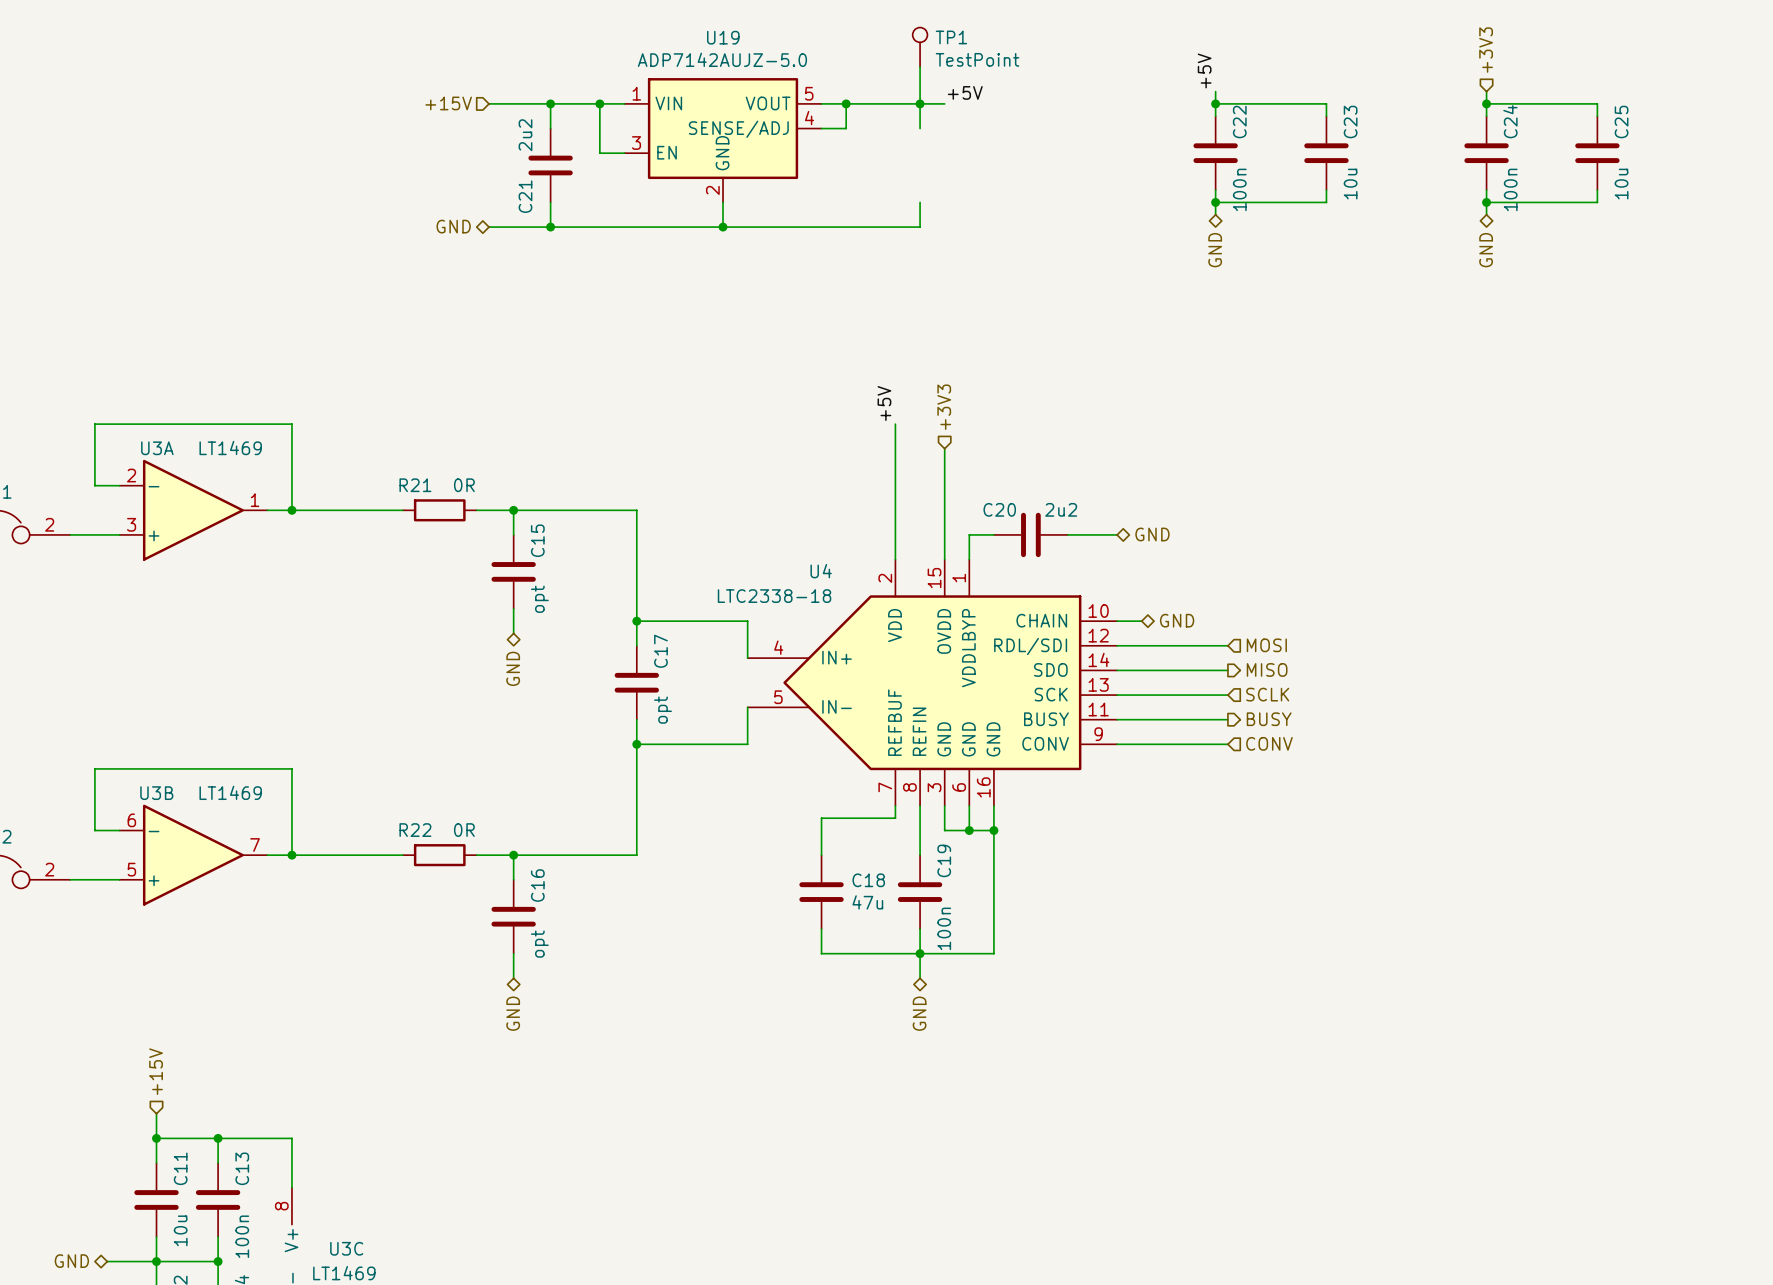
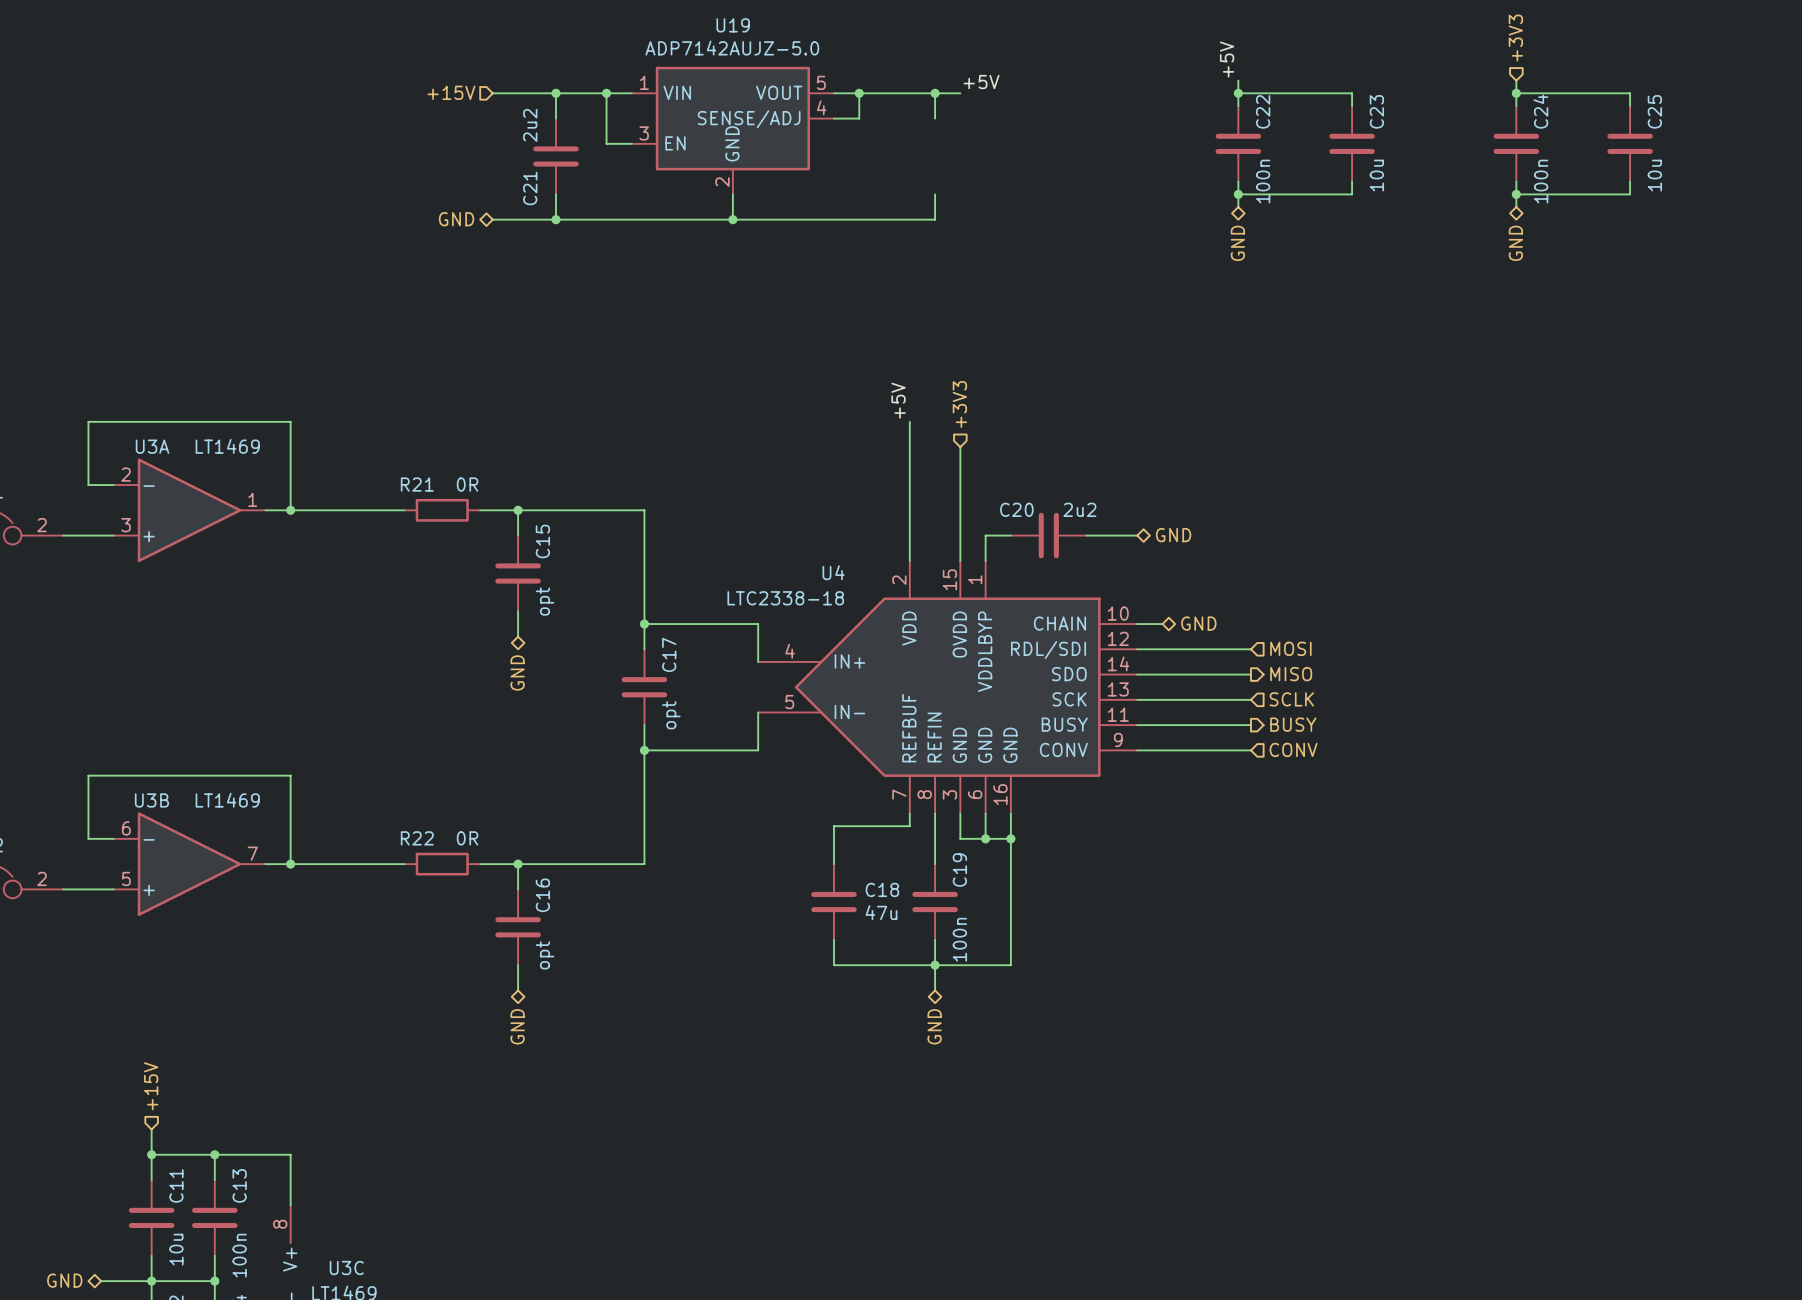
TP1: TestPoint (920, 47) -> none
wire: (920, 66) (920, 103) -> none

